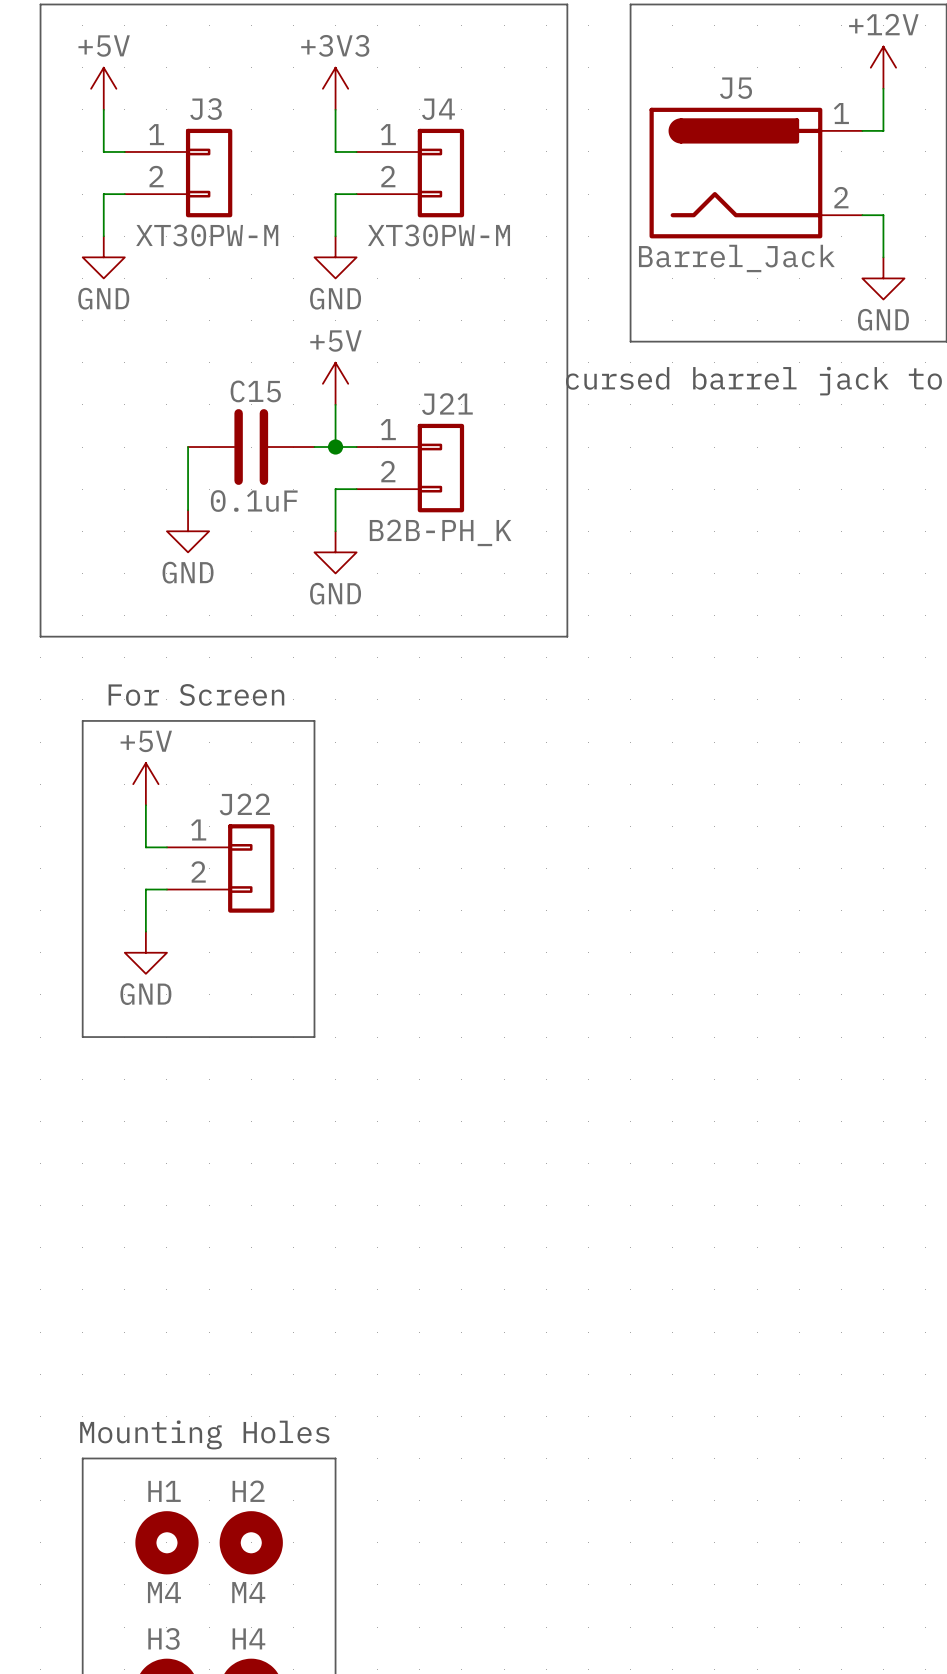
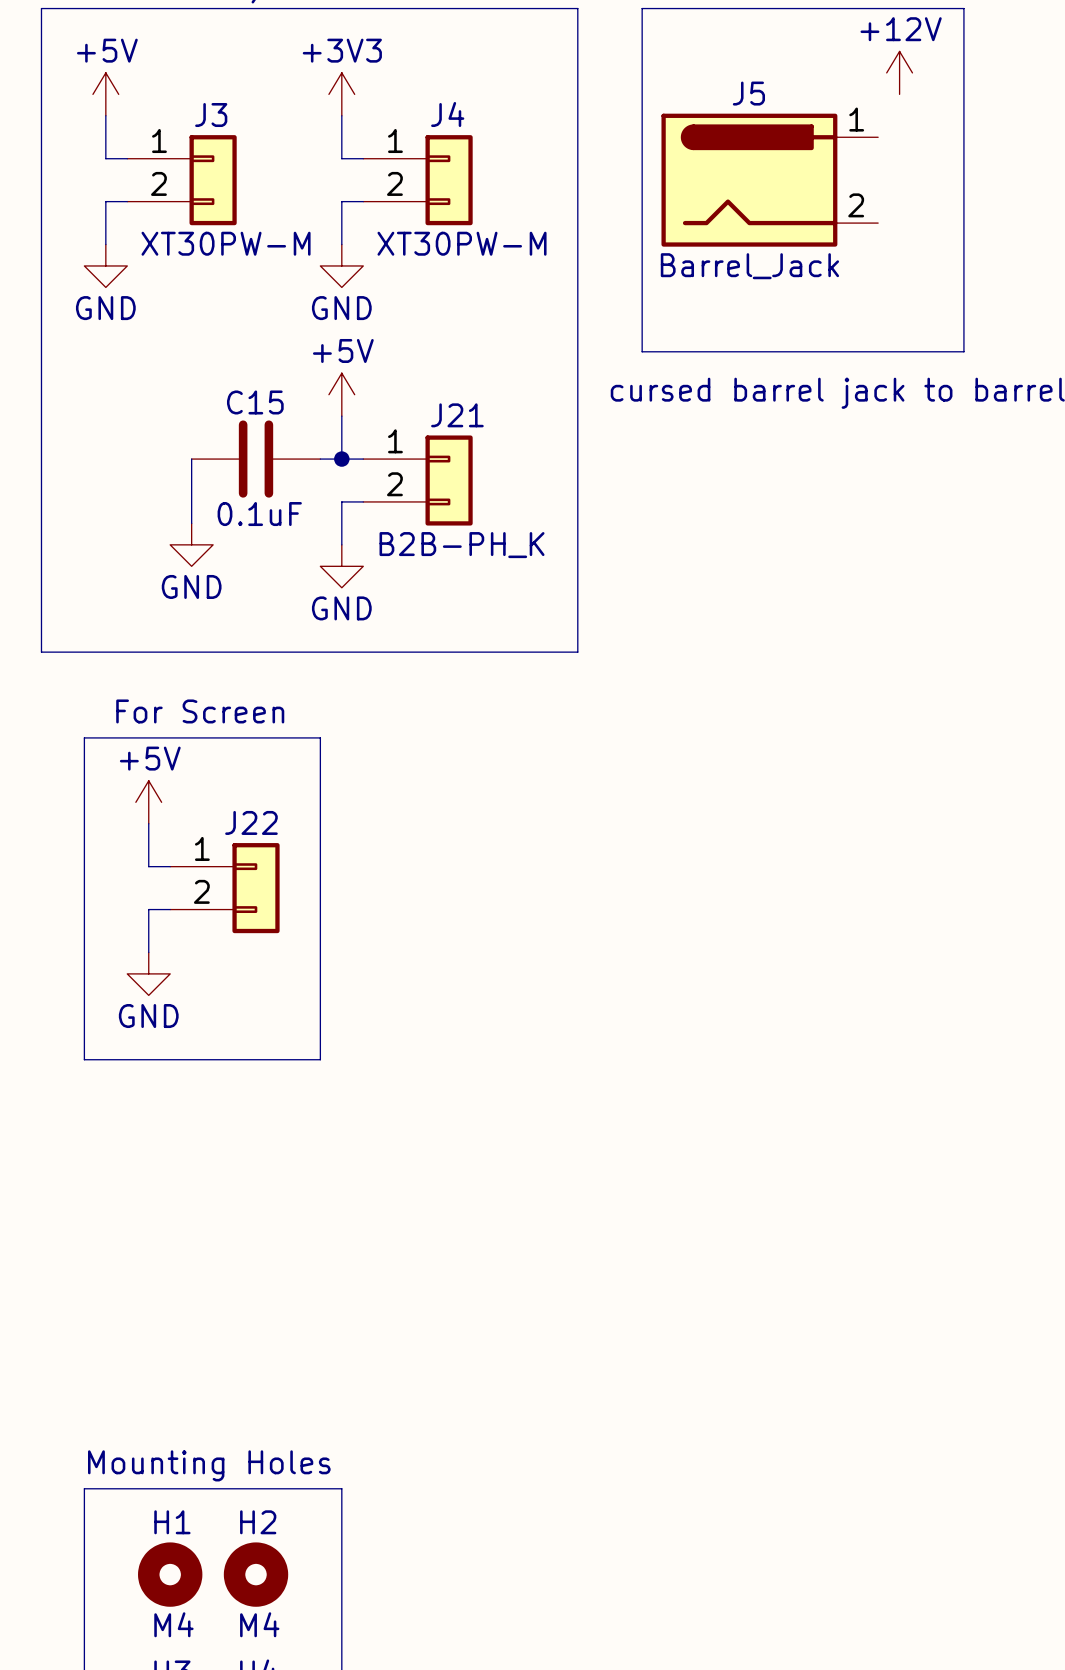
wire: (883, 88) (883, 130) (862, 130) -> none
wire: (862, 215) (883, 215) (883, 257) -> none
power symbol: GND (883, 278) -> none

